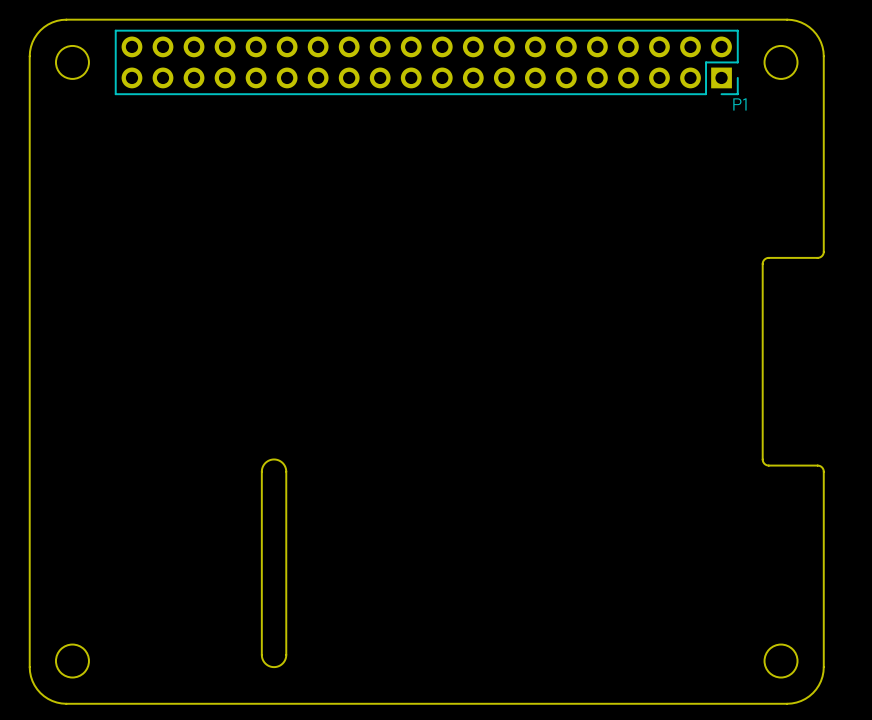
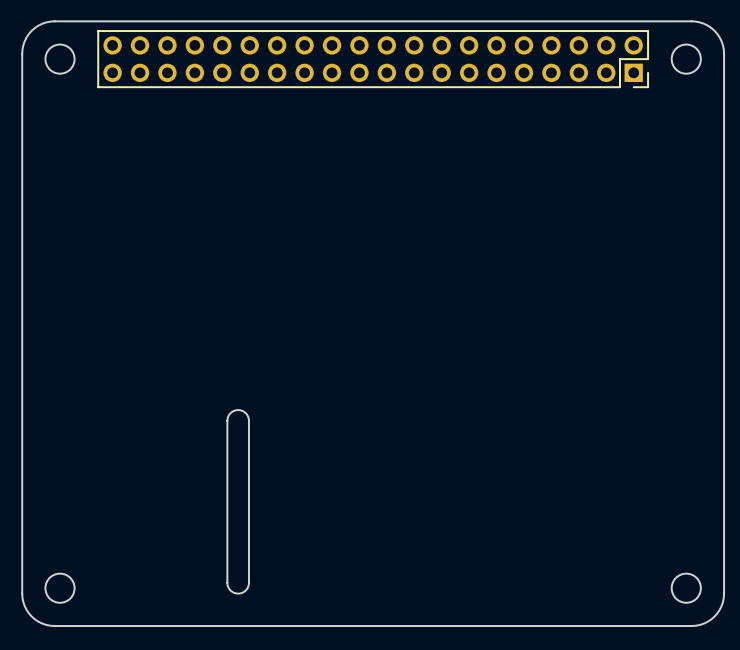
P1 name: P1 (739, 104) -> none
board edge: (823, 251) (819, 257) (768, 257) (764, 259) (762, 264) (762, 461) (768, 465) (818, 465) (823, 471) -> (724, 226) (724, 420)

